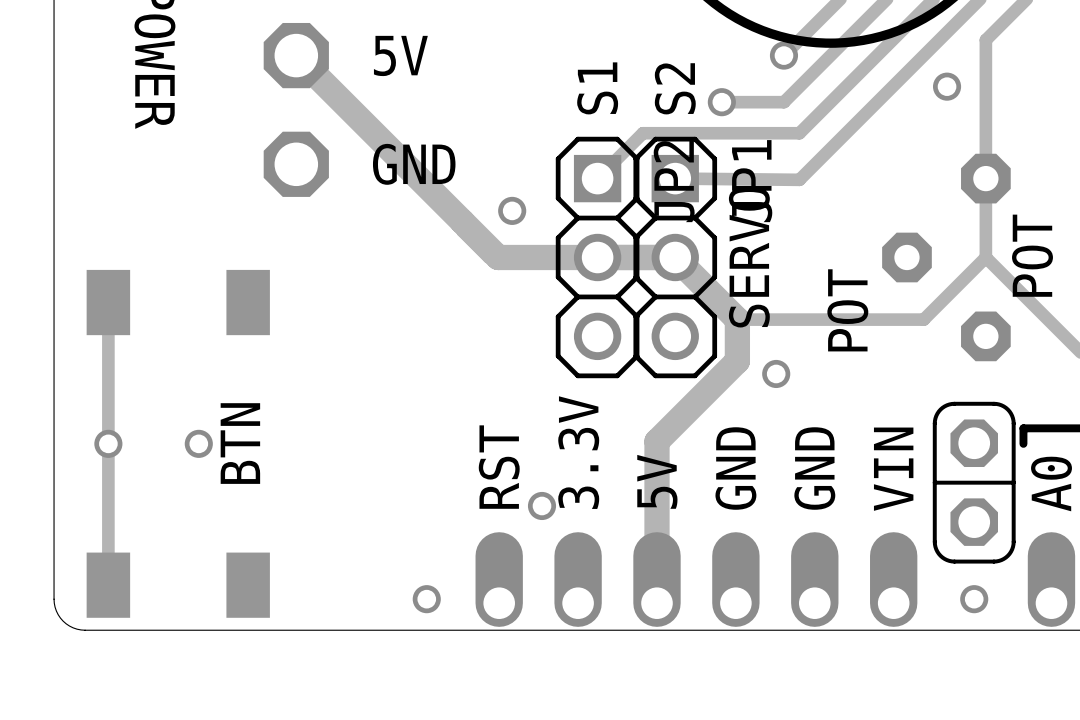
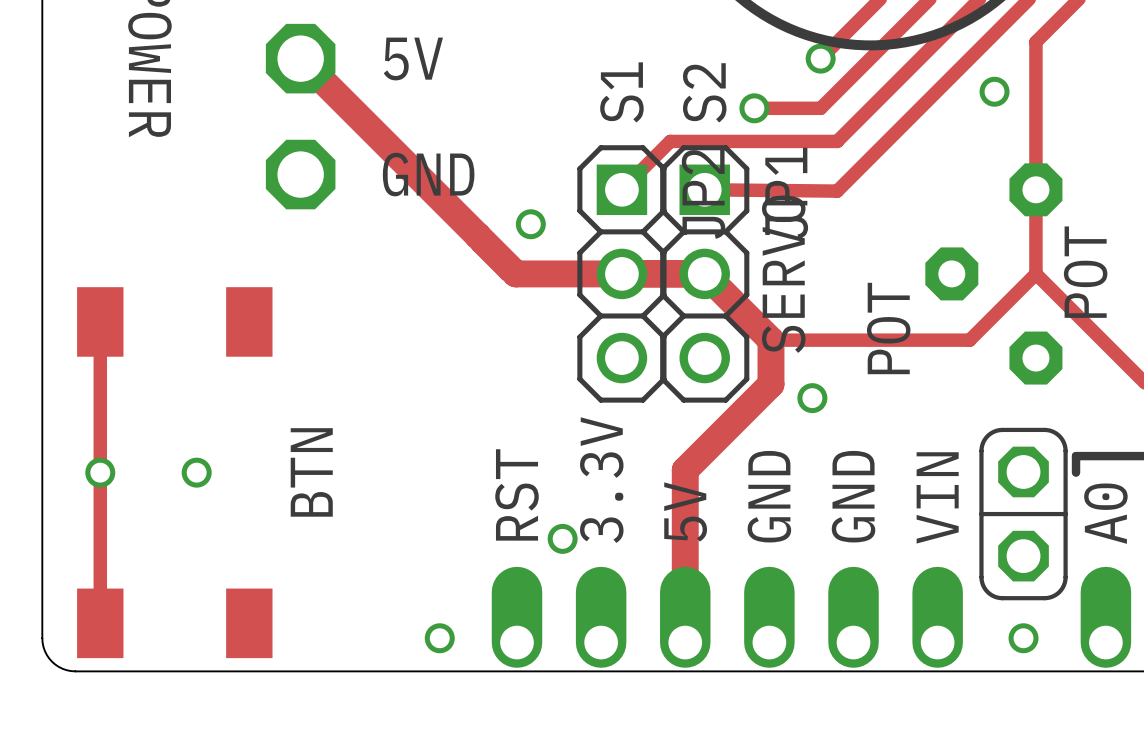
text position: BTN (240, 443) -> BTN (311, 472)

